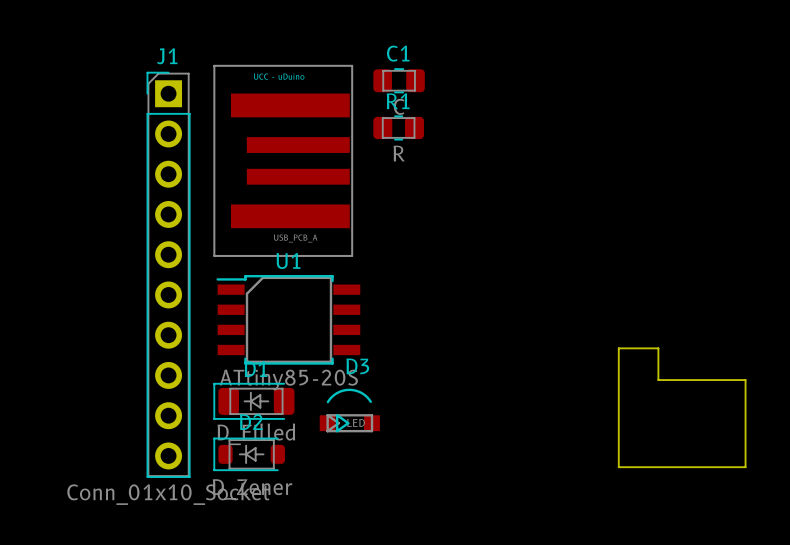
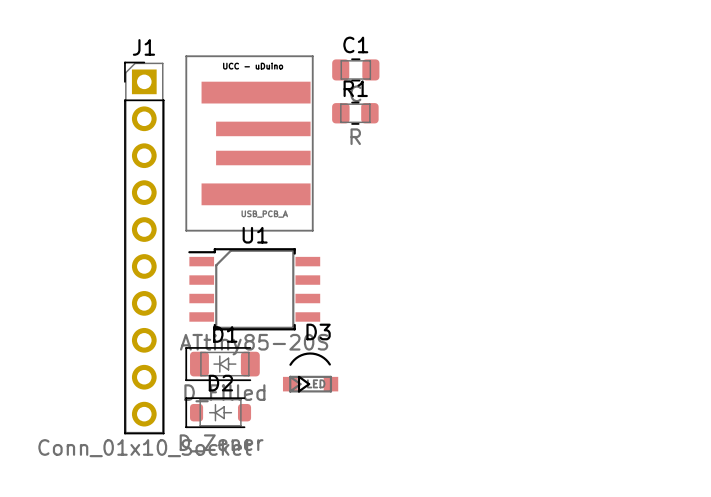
board edge: (618, 348) (618, 467) (745, 467) (745, 380) (658, 380) (658, 348) (618, 348) -> none

